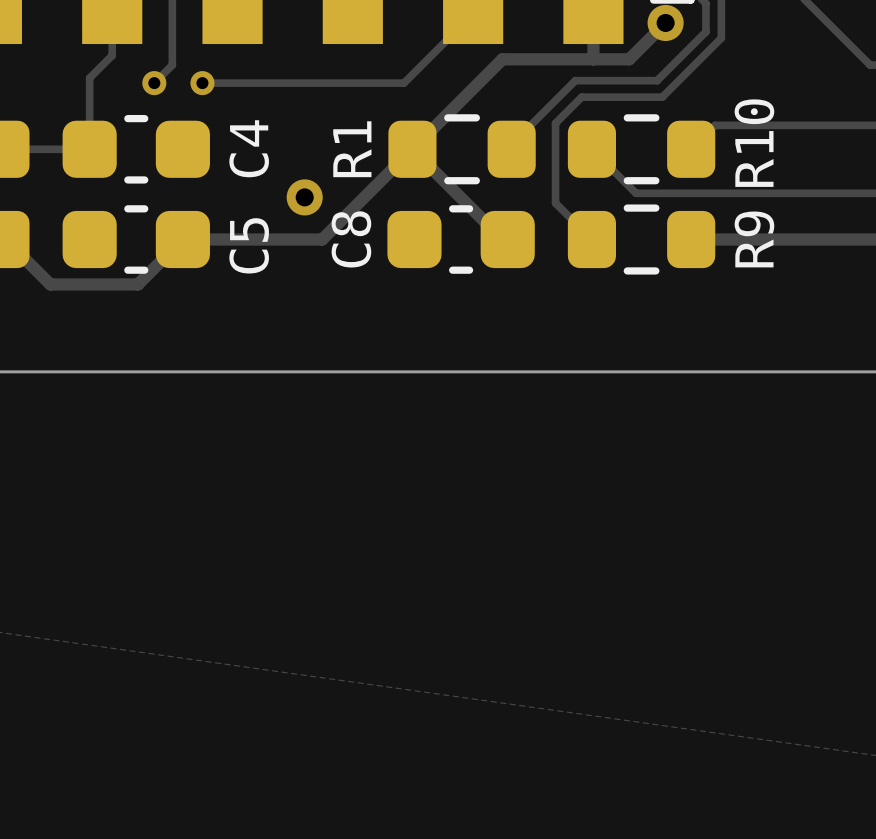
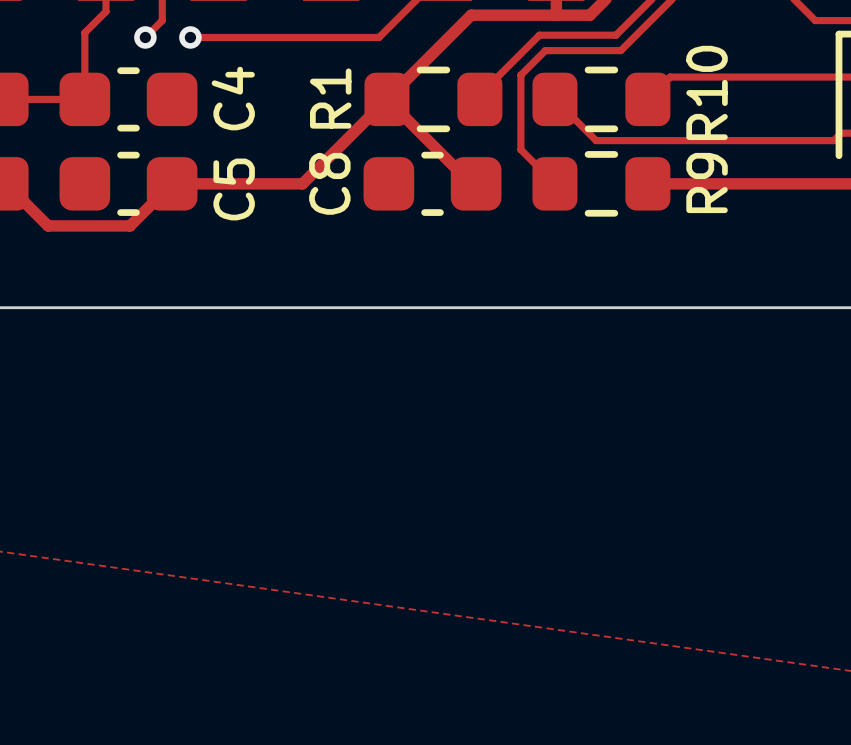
via: (304, 197) -> none

